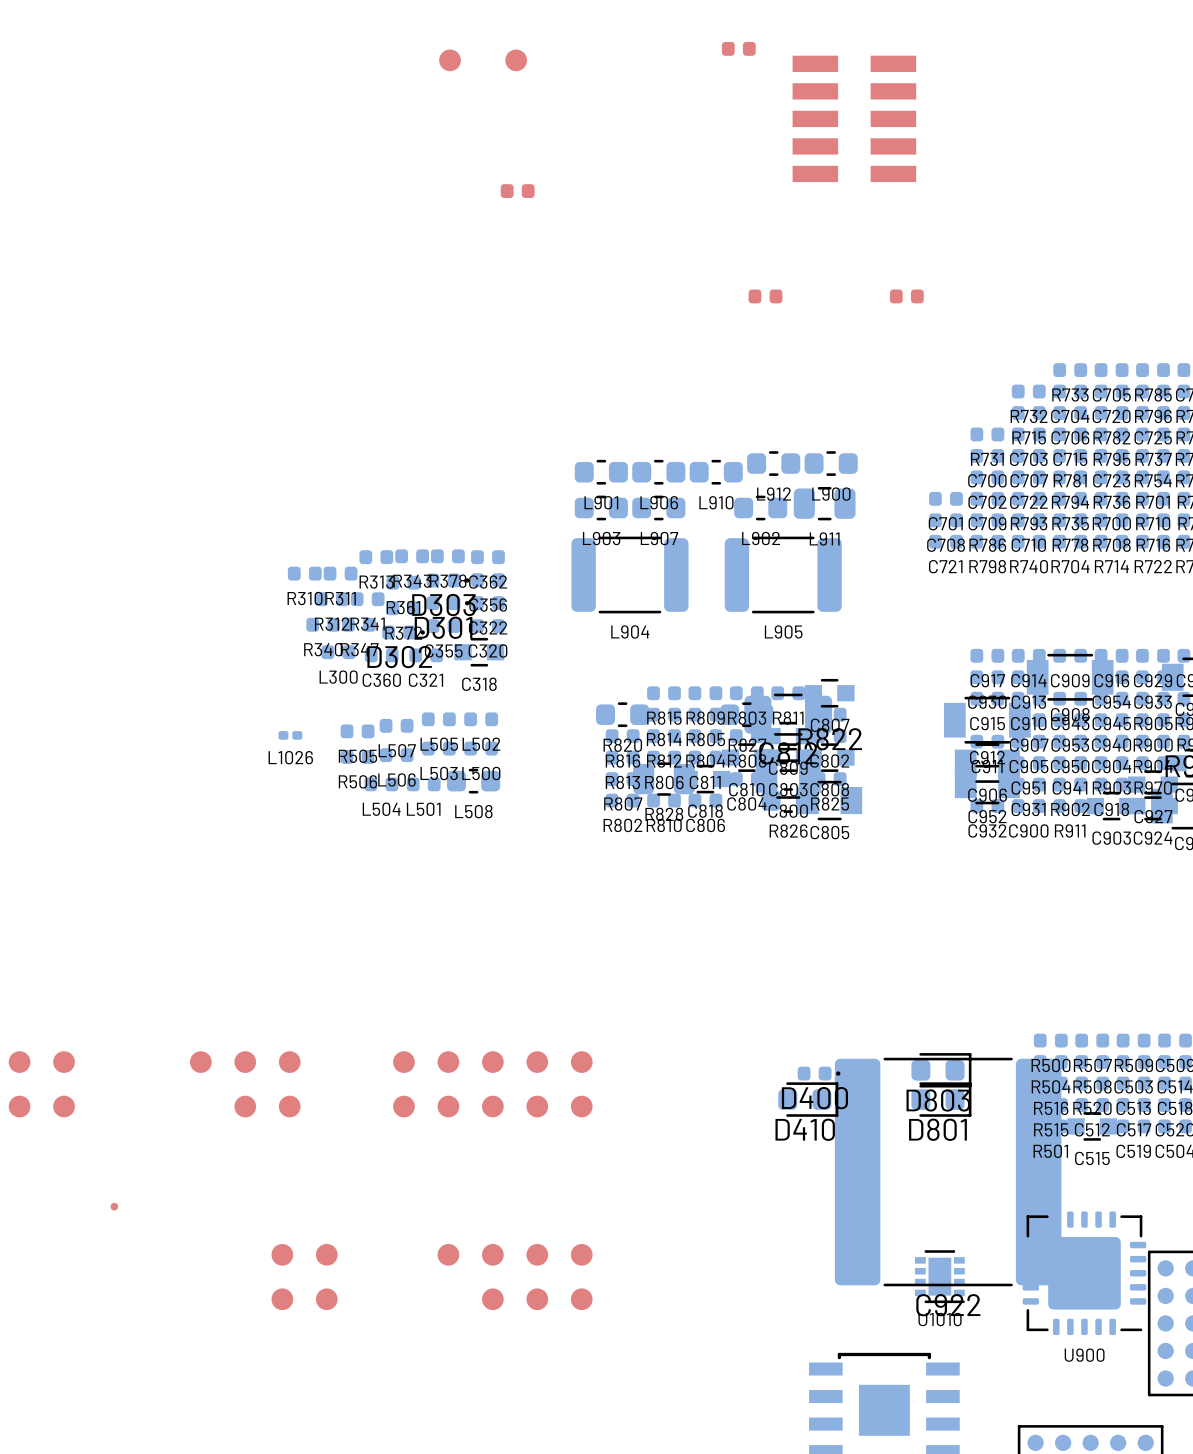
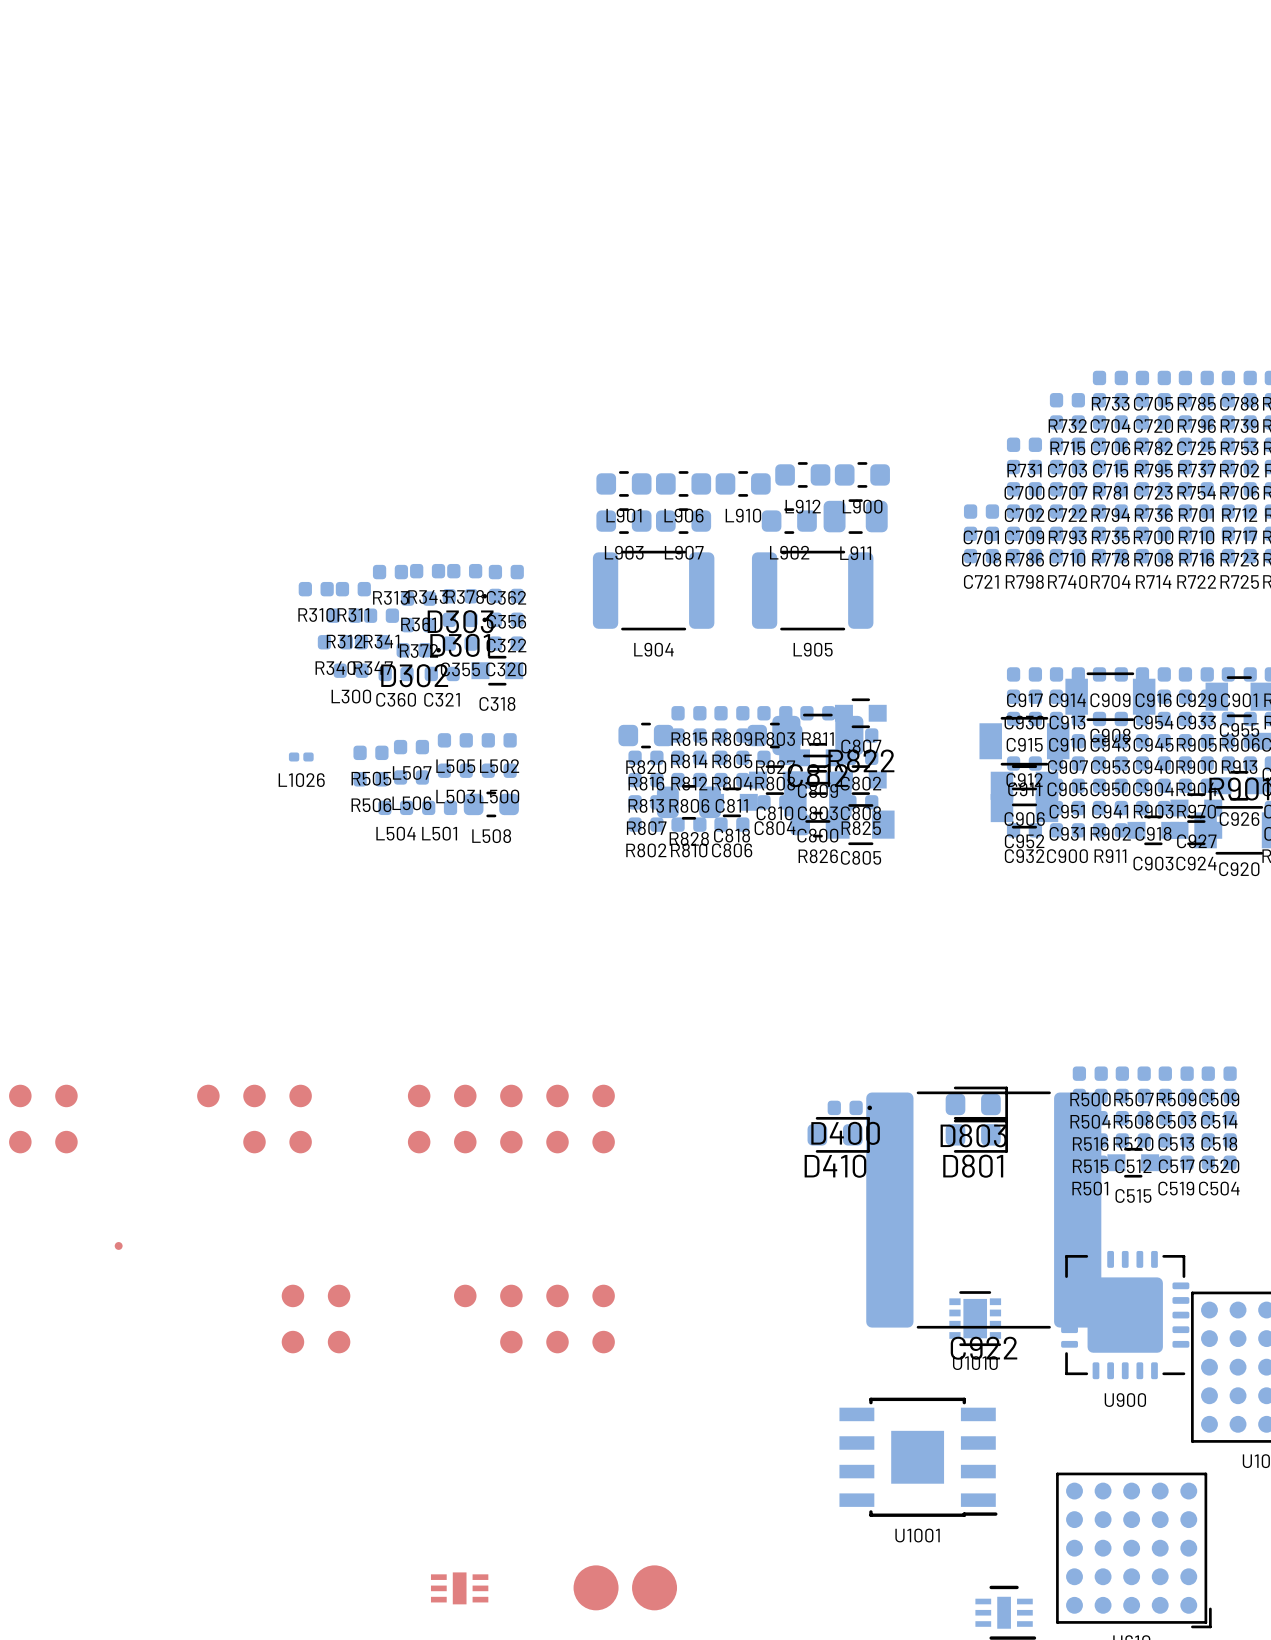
part: (738, 48) -> none
part: (450, 60) -> none
part: (516, 60) -> none
part: (854, 118) -> none
part: (517, 191) -> none
part: (765, 296) -> none
part: (906, 296) -> none

